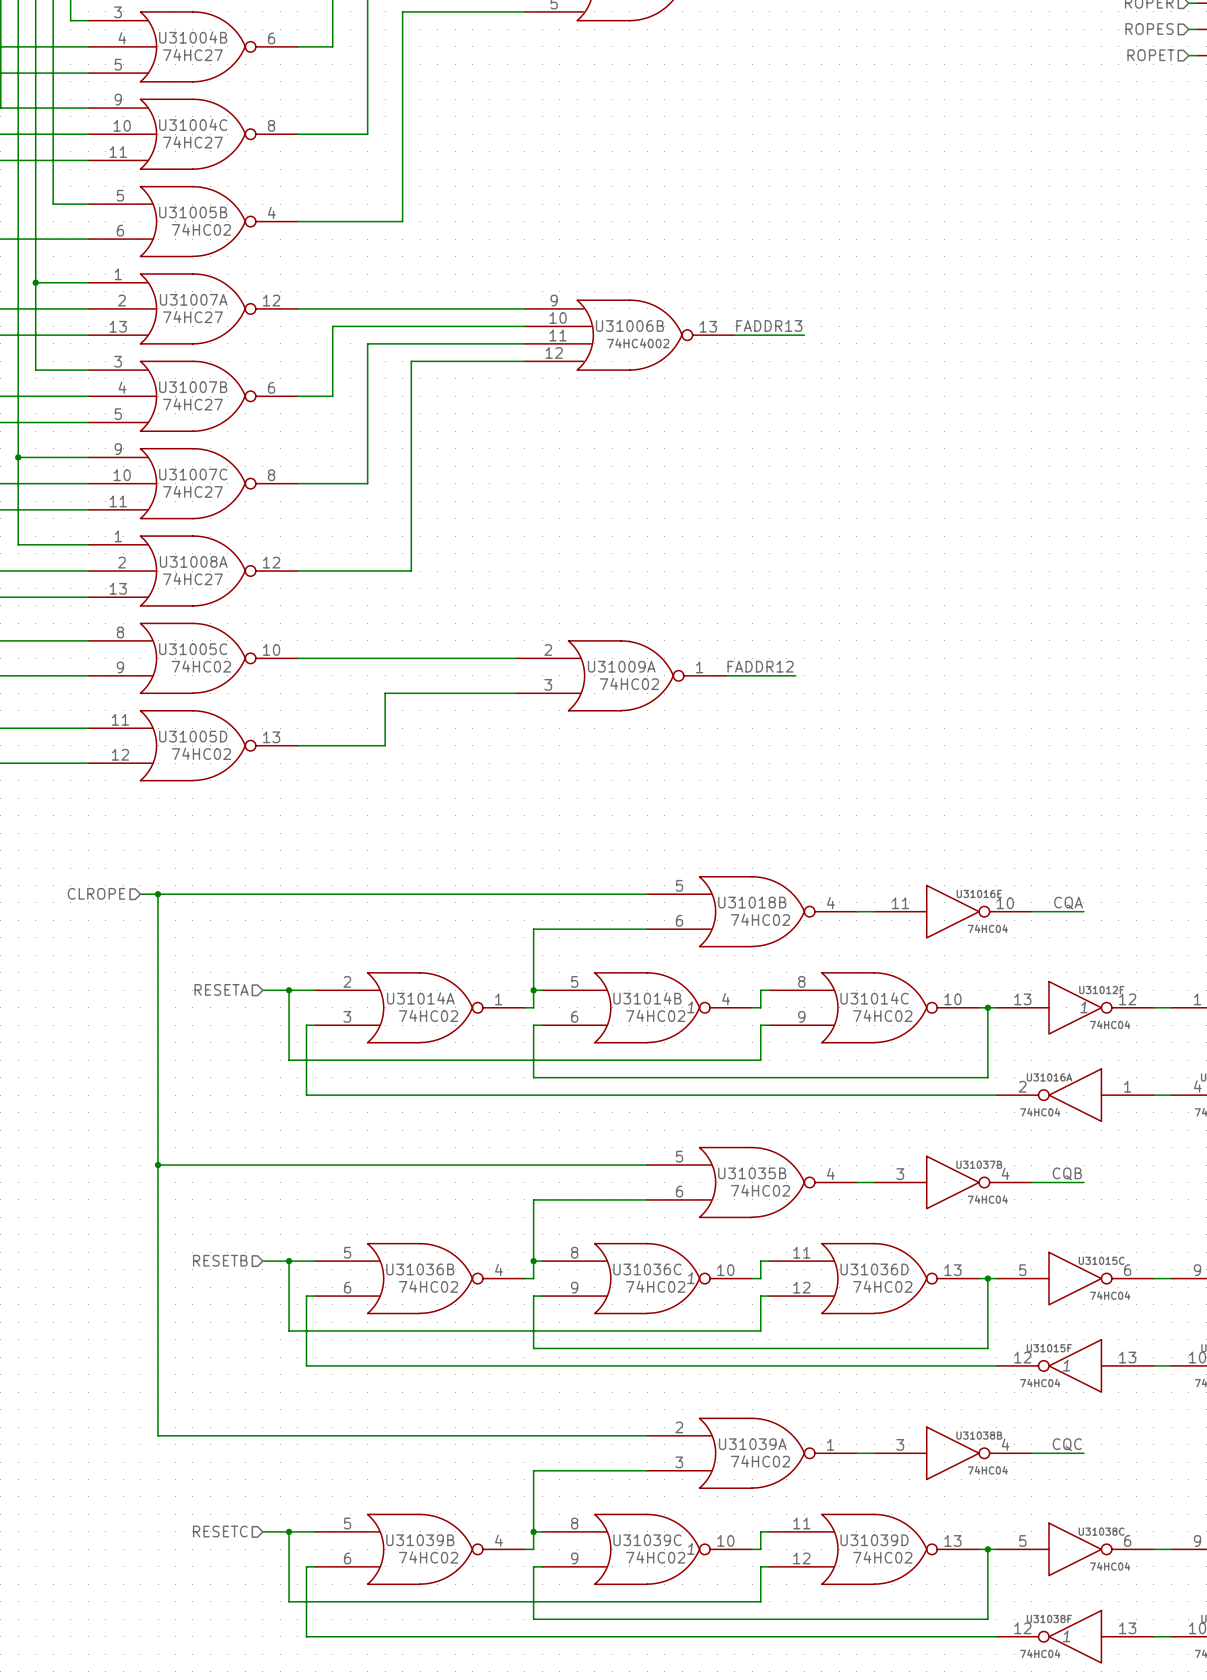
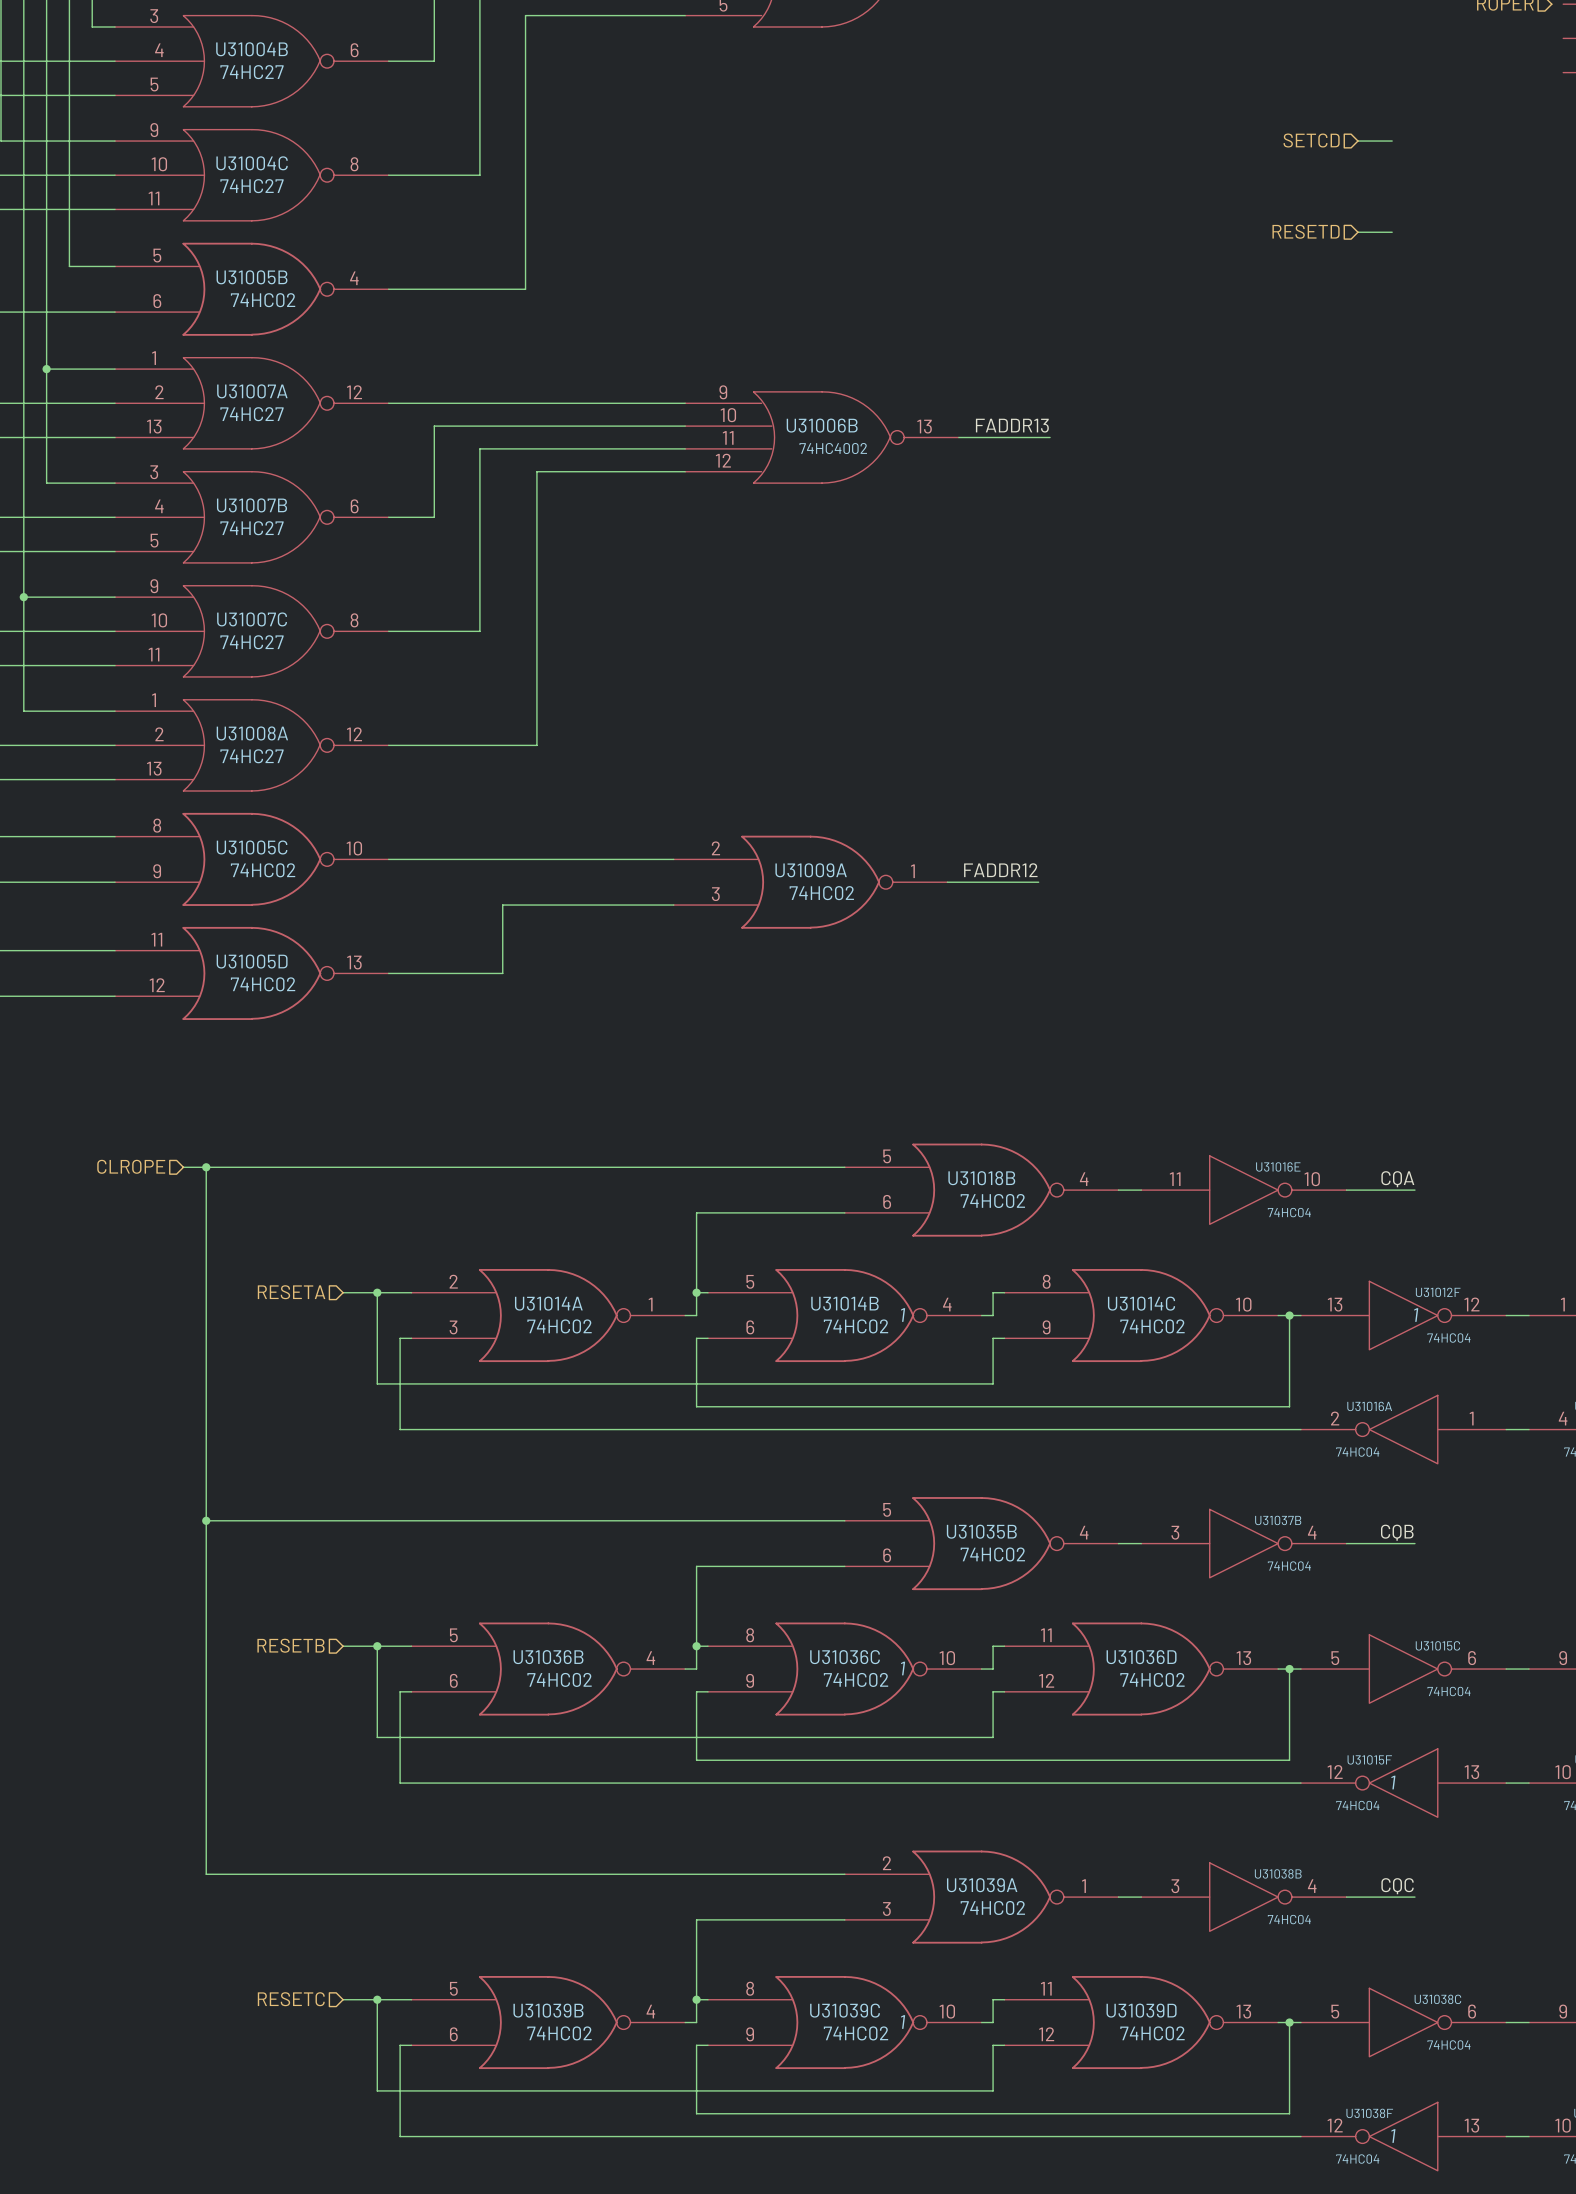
wire: (1188, 3) (1197, 3) -> none
hierarchical label: ROPES (1149, 29) -> none
wire: (1188, 29) (1197, 29) -> none
hierarchical label: ROPET (1151, 55) -> none
wire: (1188, 55) (1197, 55) -> none
hierarchical label: none -> SETCD (1311, 140)
wire: none -> (1357, 141) (1392, 141)
hierarchical label: none -> RESETD (1306, 231)
wire: none -> (1357, 232) (1392, 232)

